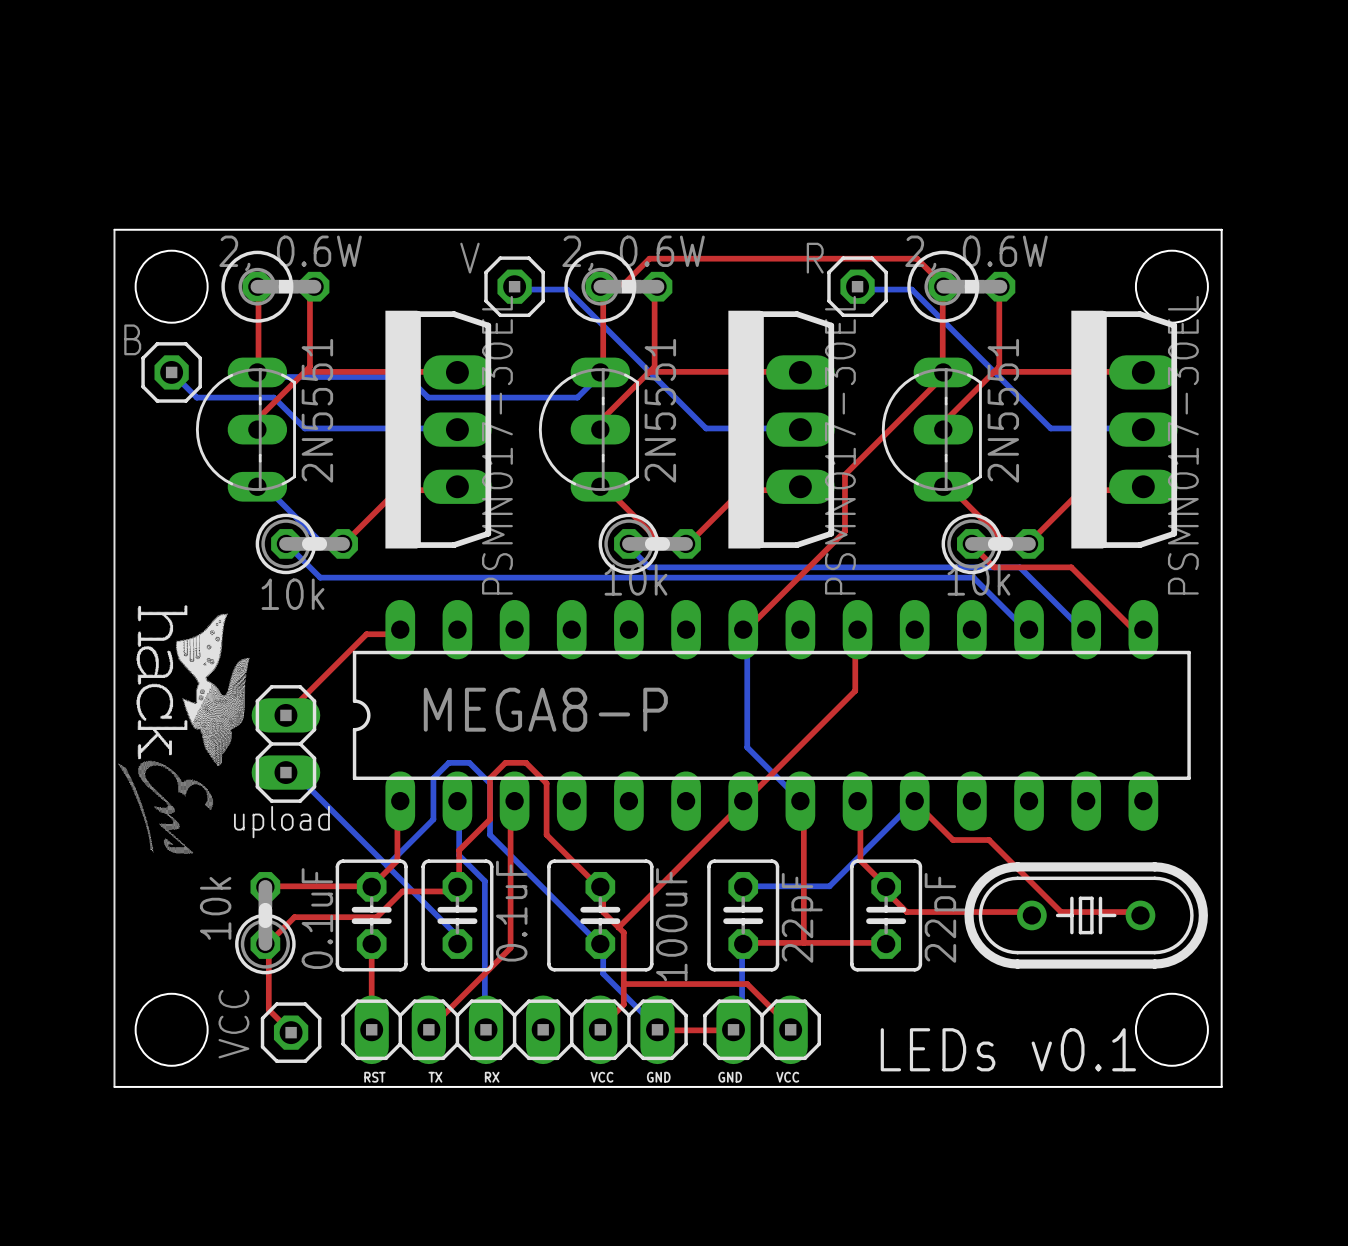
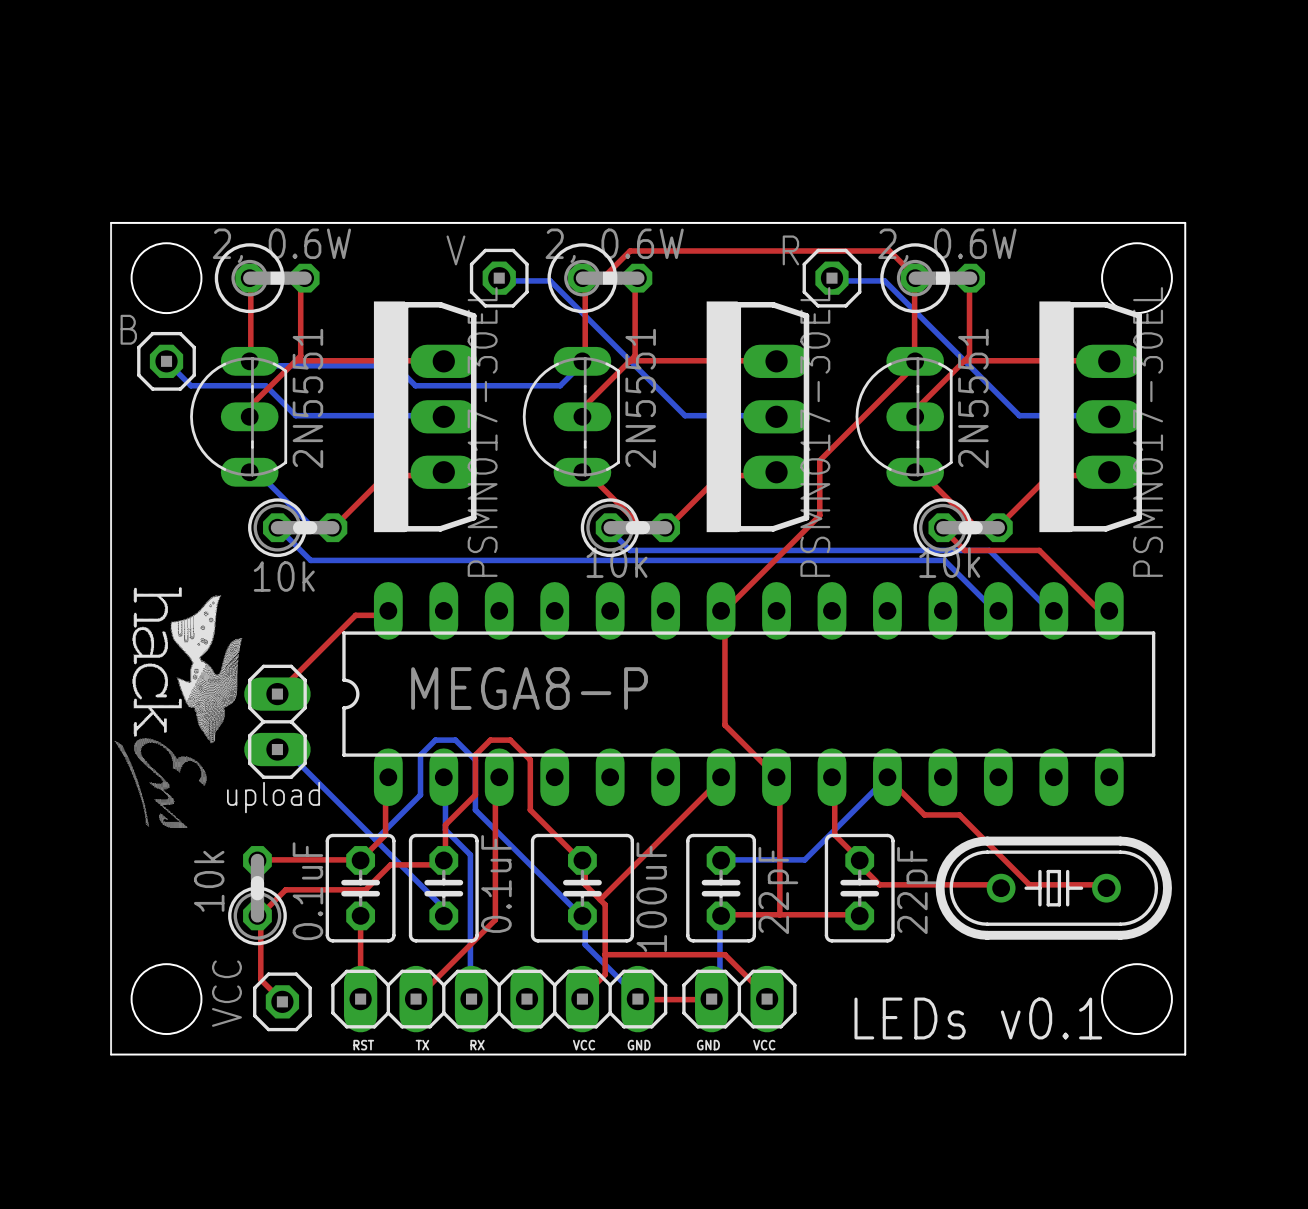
top track: none -> (721, 610) (724, 615) (724, 725) (776, 777)
bottom track: (743, 629) (747, 634) (747, 747) (800, 801) -> none
top track: (857, 629) (855, 634) (855, 690) (743, 801) -> none

